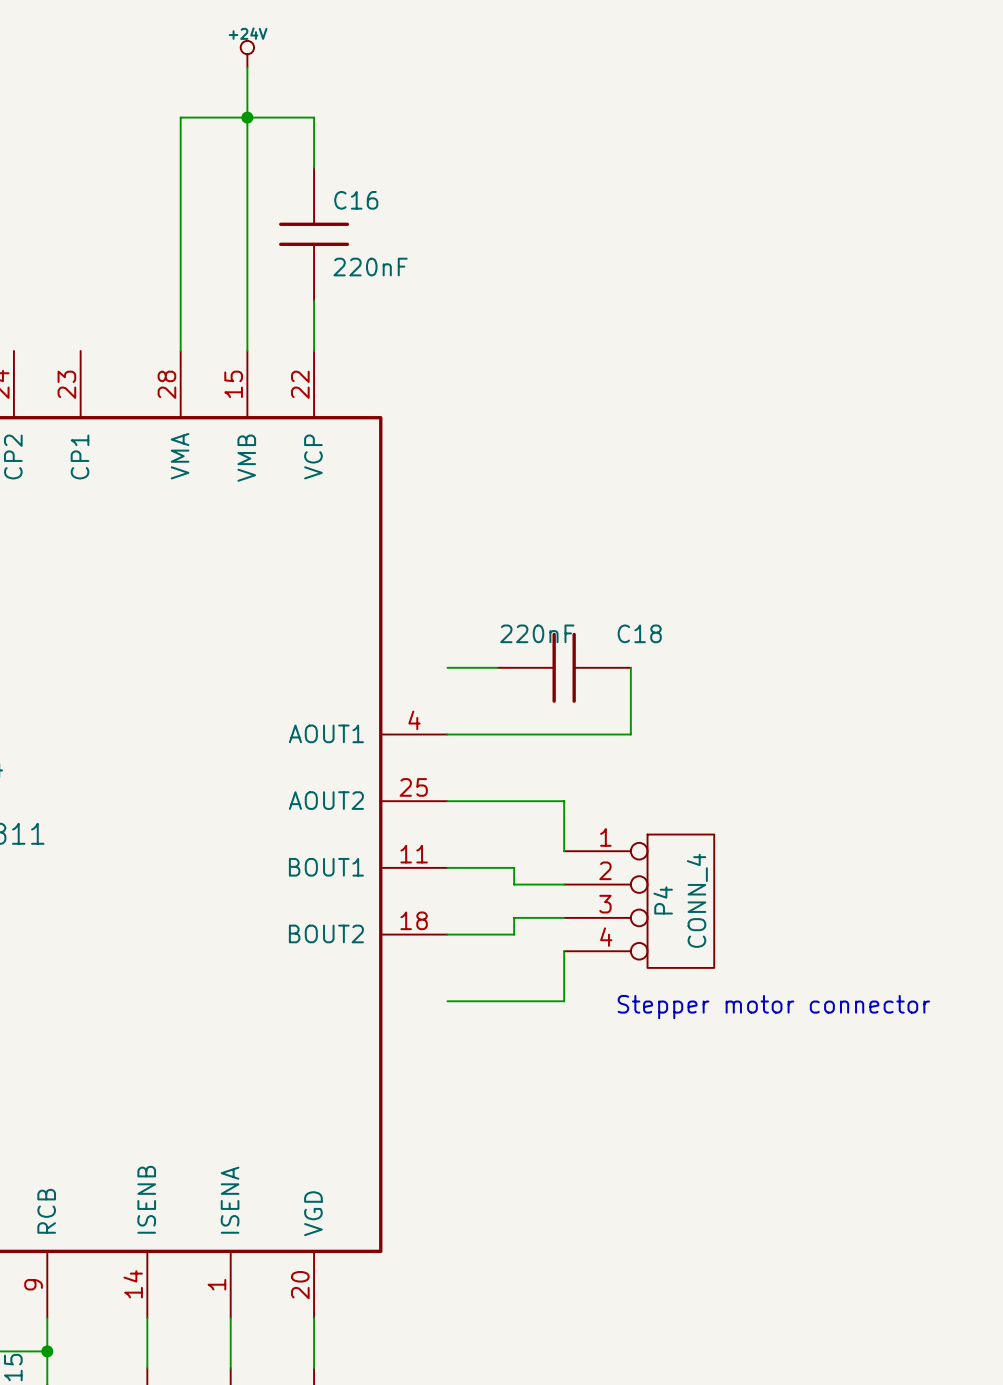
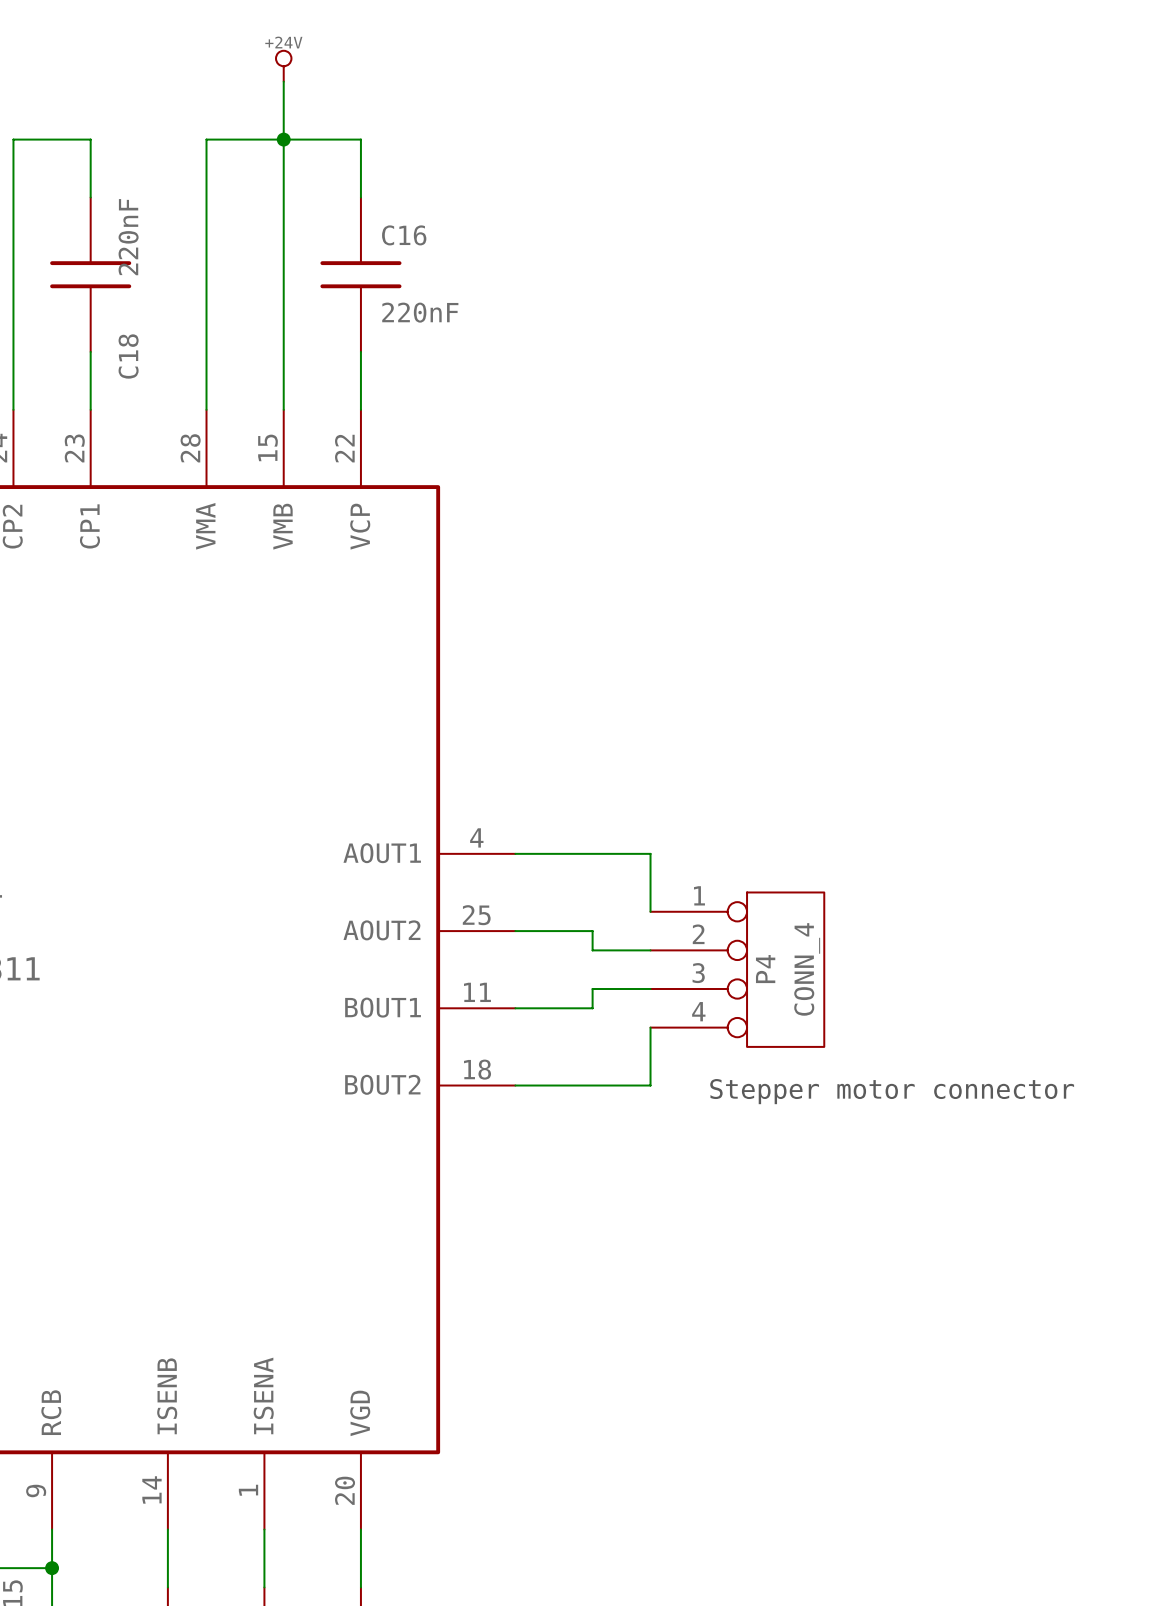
wire: none -> (90, 197) (90, 139) (13, 139) (13, 409)
wire: none -> (90, 351) (90, 409)
wire: (447, 667) (497, 667) -> none
C18 rotation: 0° (564, 667) -> 90° clockwise (90, 274)
C18 position: (564, 667) -> (90, 274)
wire: (630, 667) (630, 734) (564, 734) -> (650, 911) (650, 853)
wire: (514, 801) (564, 801) (564, 851) -> (592, 931) (592, 950) (650, 950)
wire: (514, 867) (514, 884) (564, 884) -> (592, 1008) (592, 988) (650, 988)
P4 position: (639, 901) -> (737, 969)
wire: (564, 917) (514, 917) (514, 934) -> (650, 1027) (650, 1085) (592, 1085)
wire: (564, 951) (564, 1001) (447, 1001) -> none
text position: Stepper motor connector (773, 1007) -> Stepper motor connector (892, 1091)

